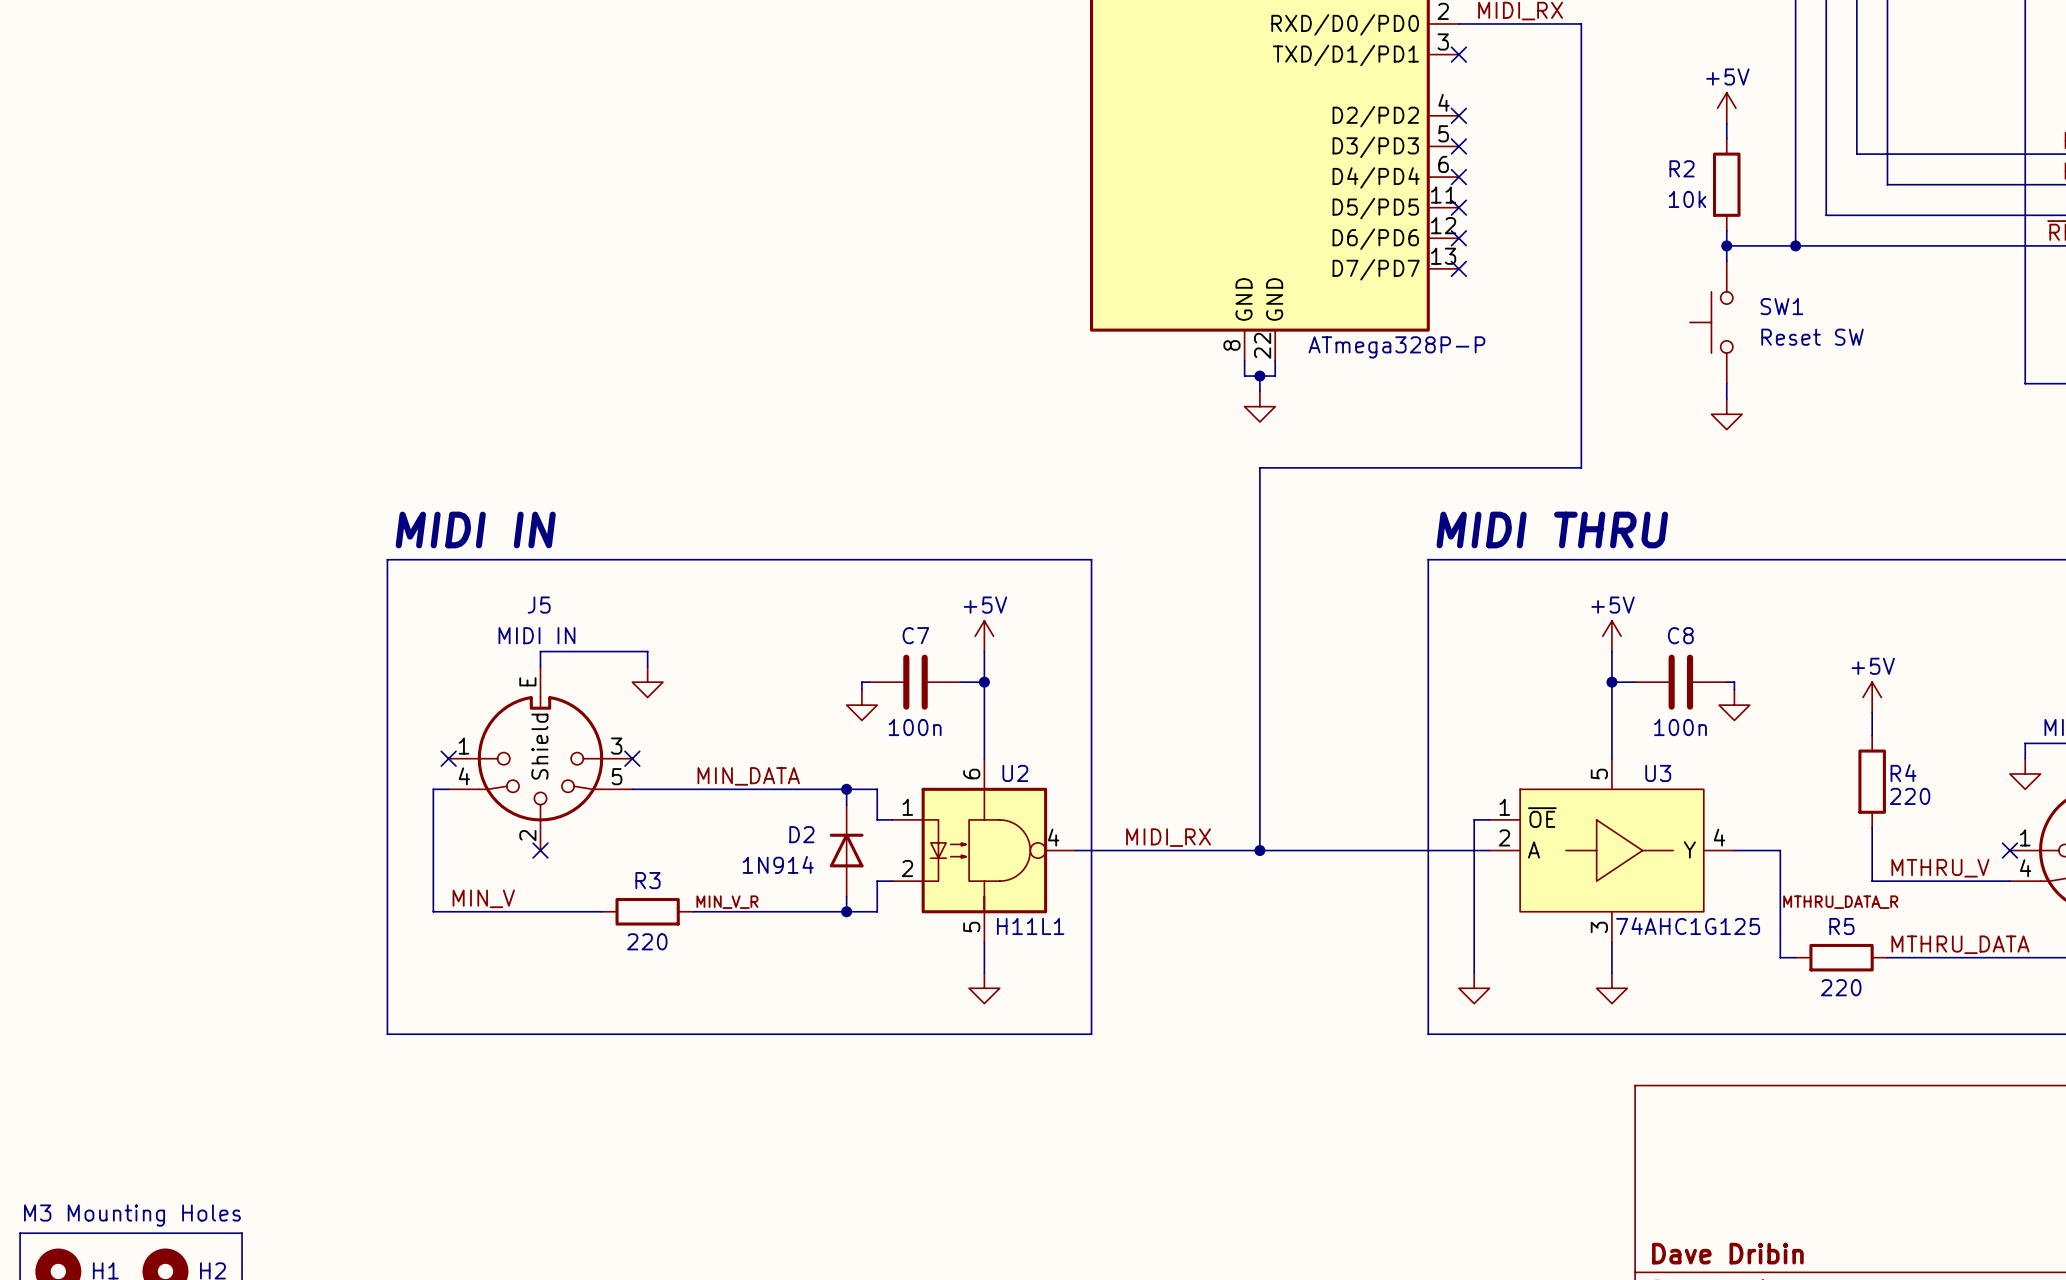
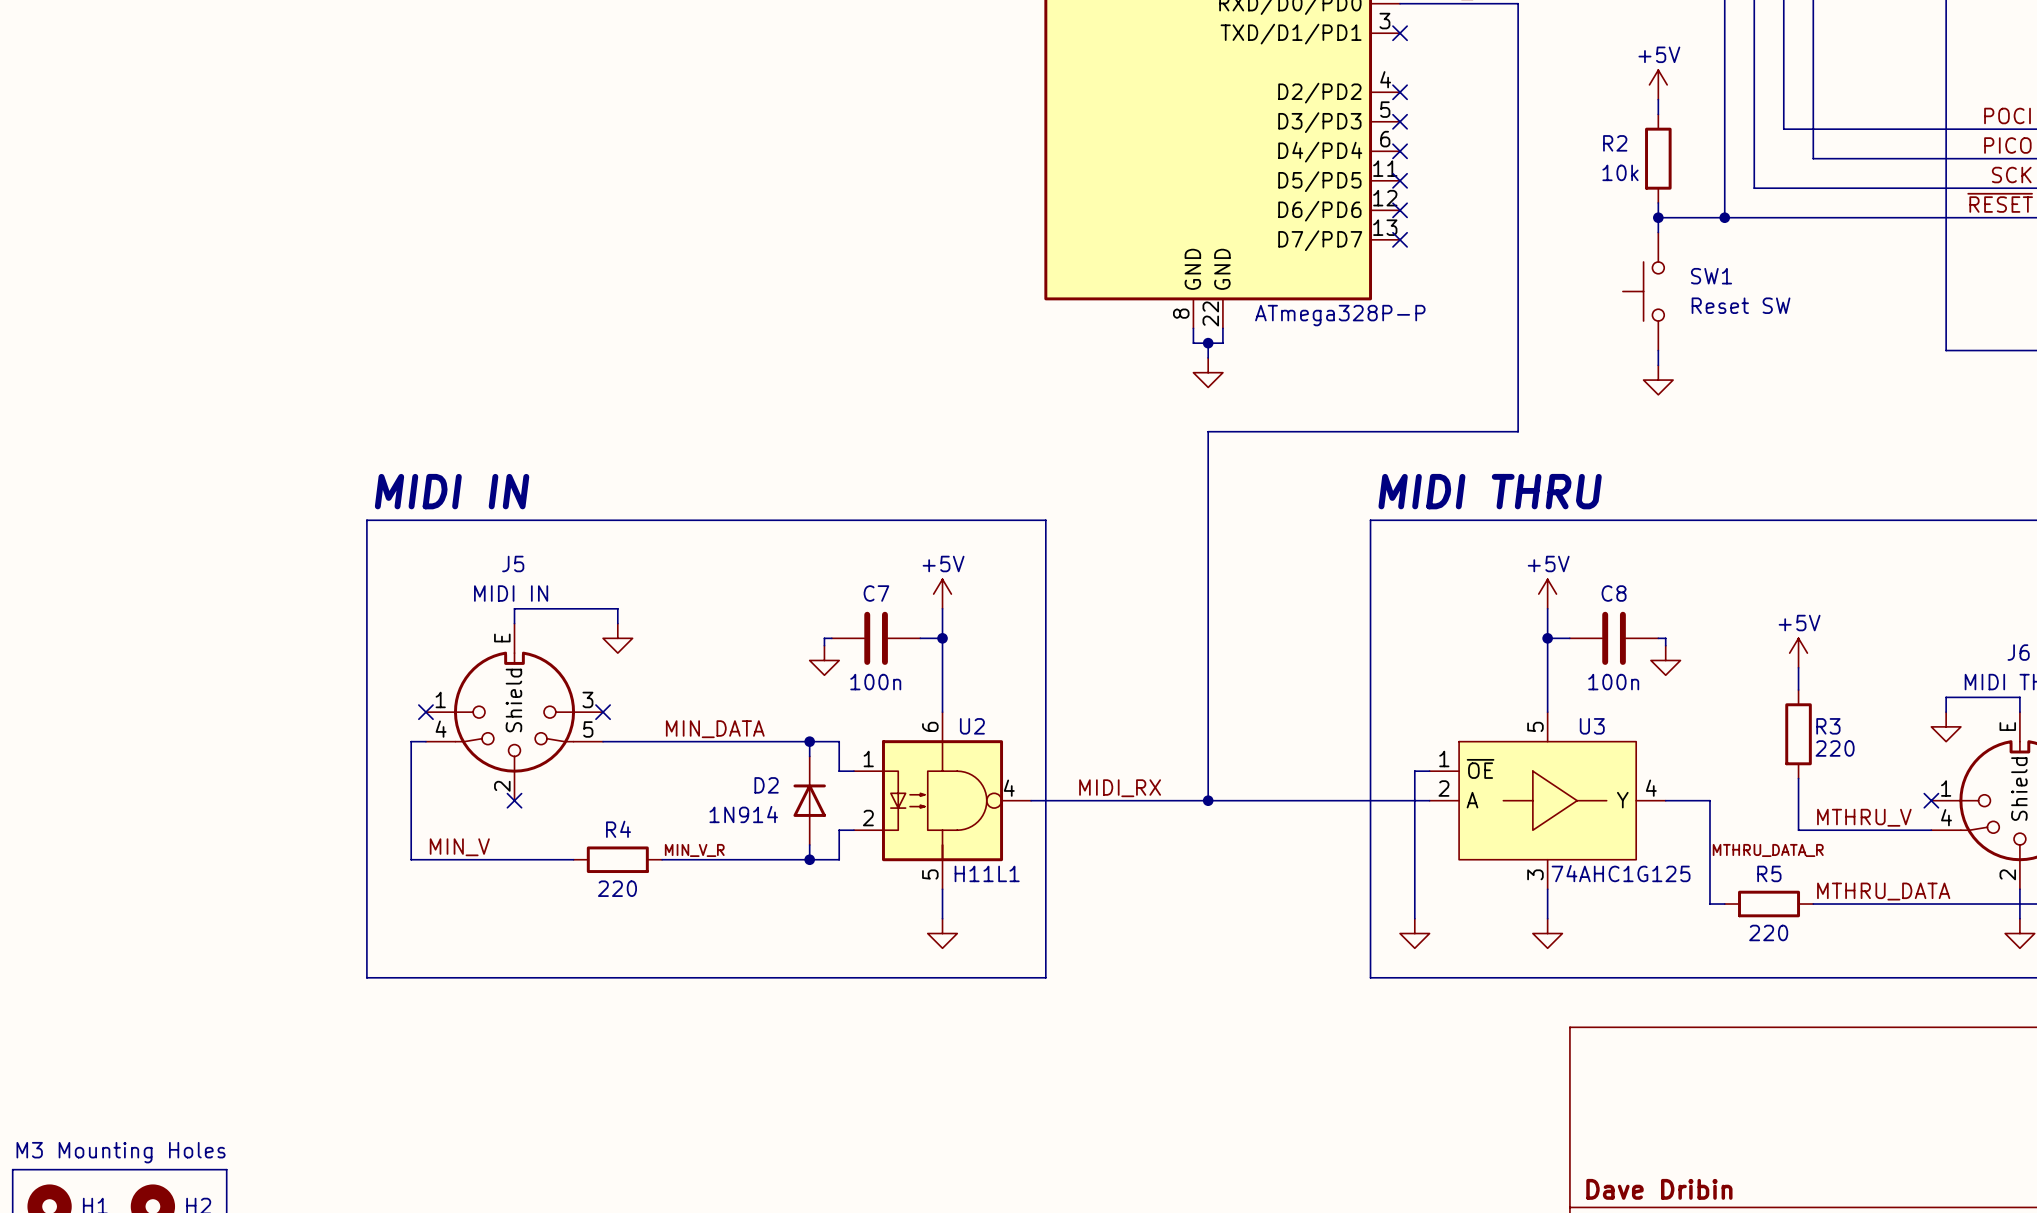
R4 name: R4 (1903, 773) -> R3 (1828, 726)
R3 name: R3 (648, 880) -> R4 (618, 829)

